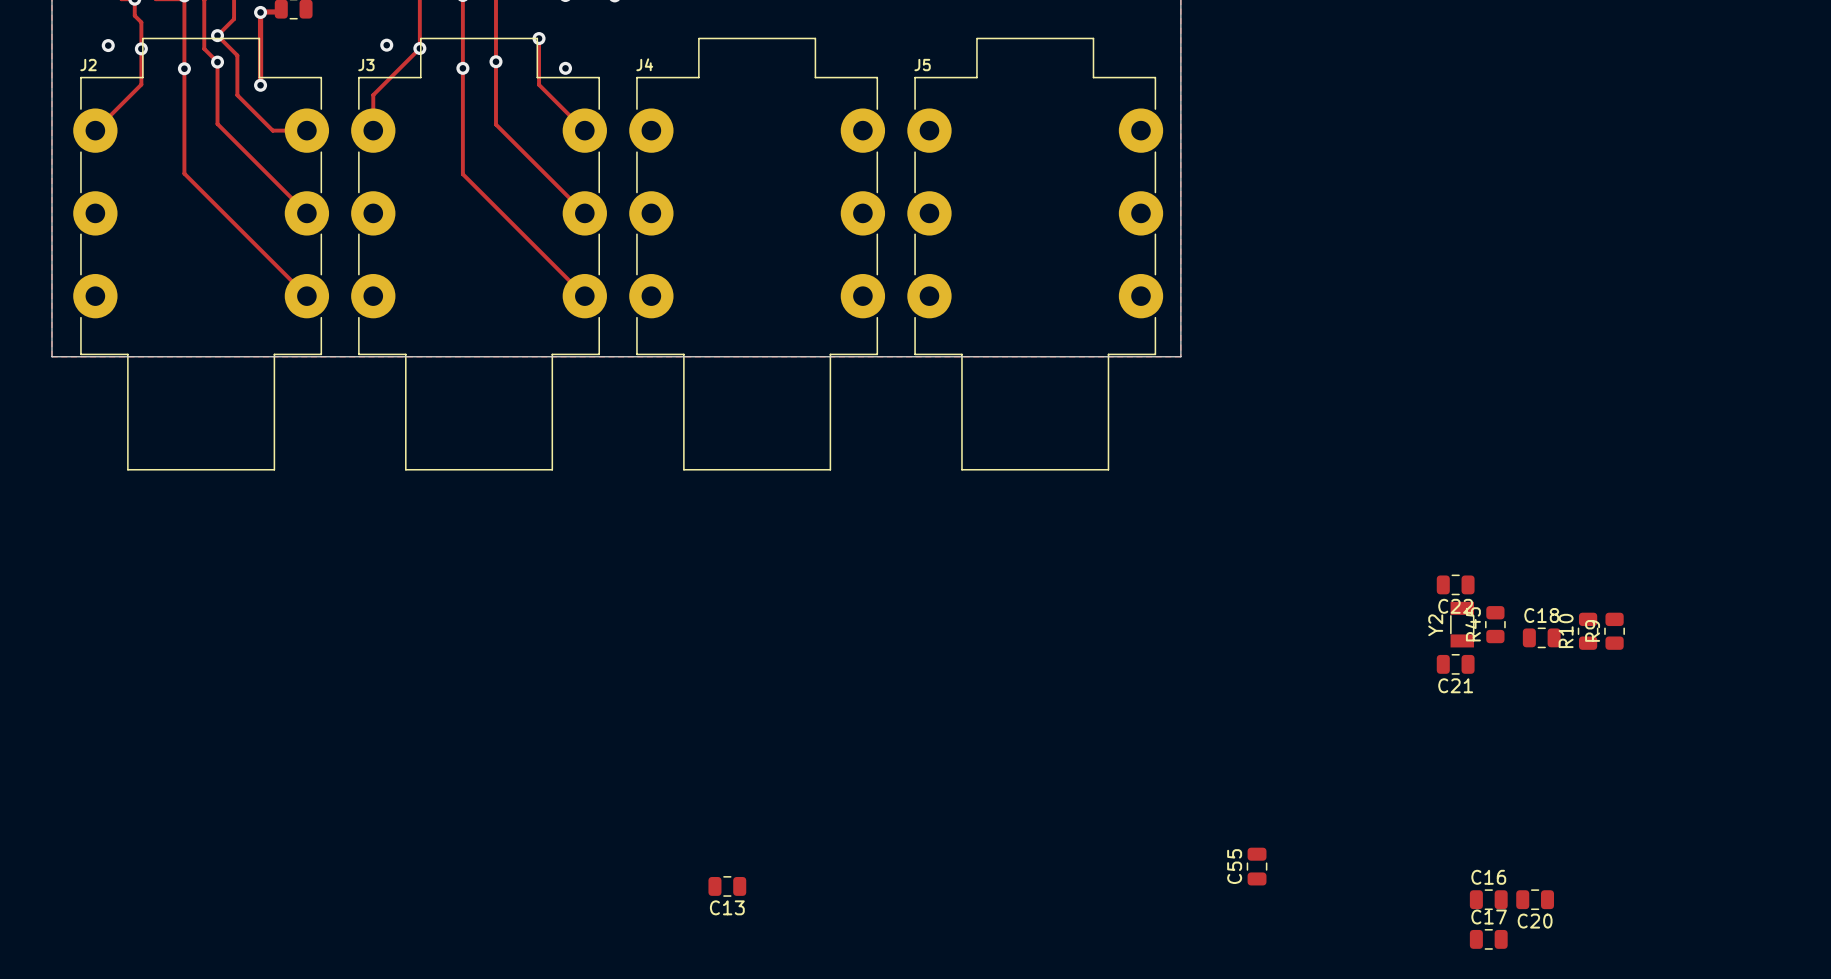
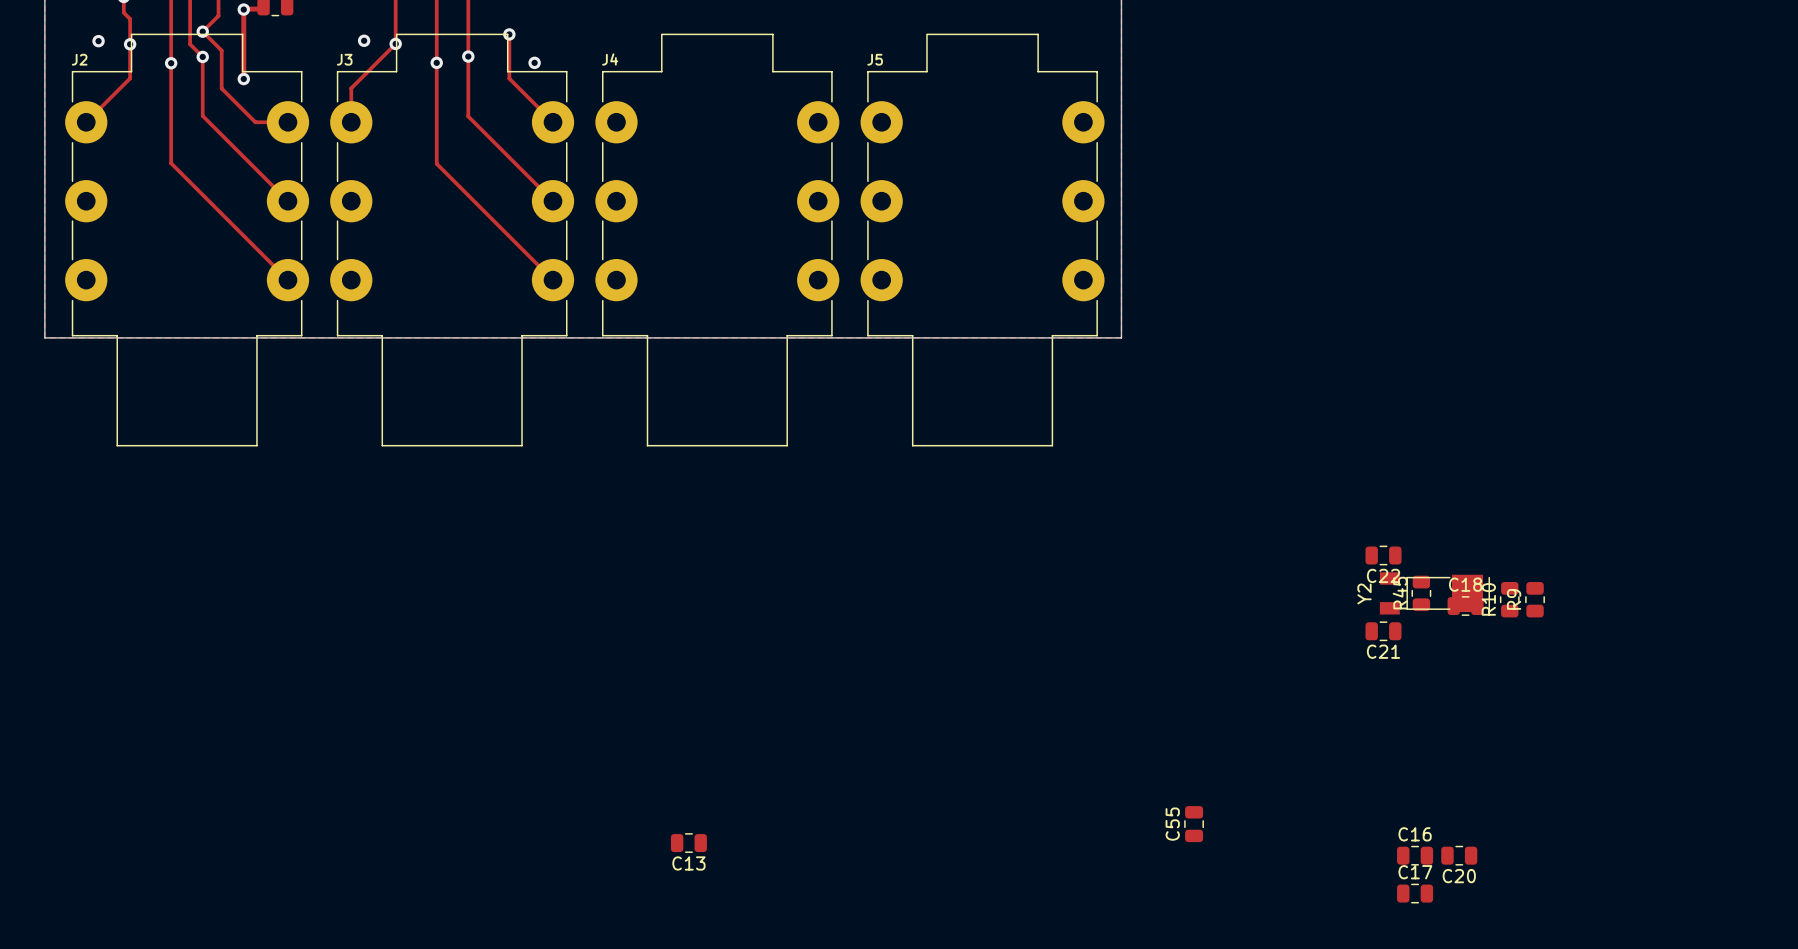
Y2 footprint: [1450, 601, 1475, 648] -> [1379, 572, 1491, 615]

